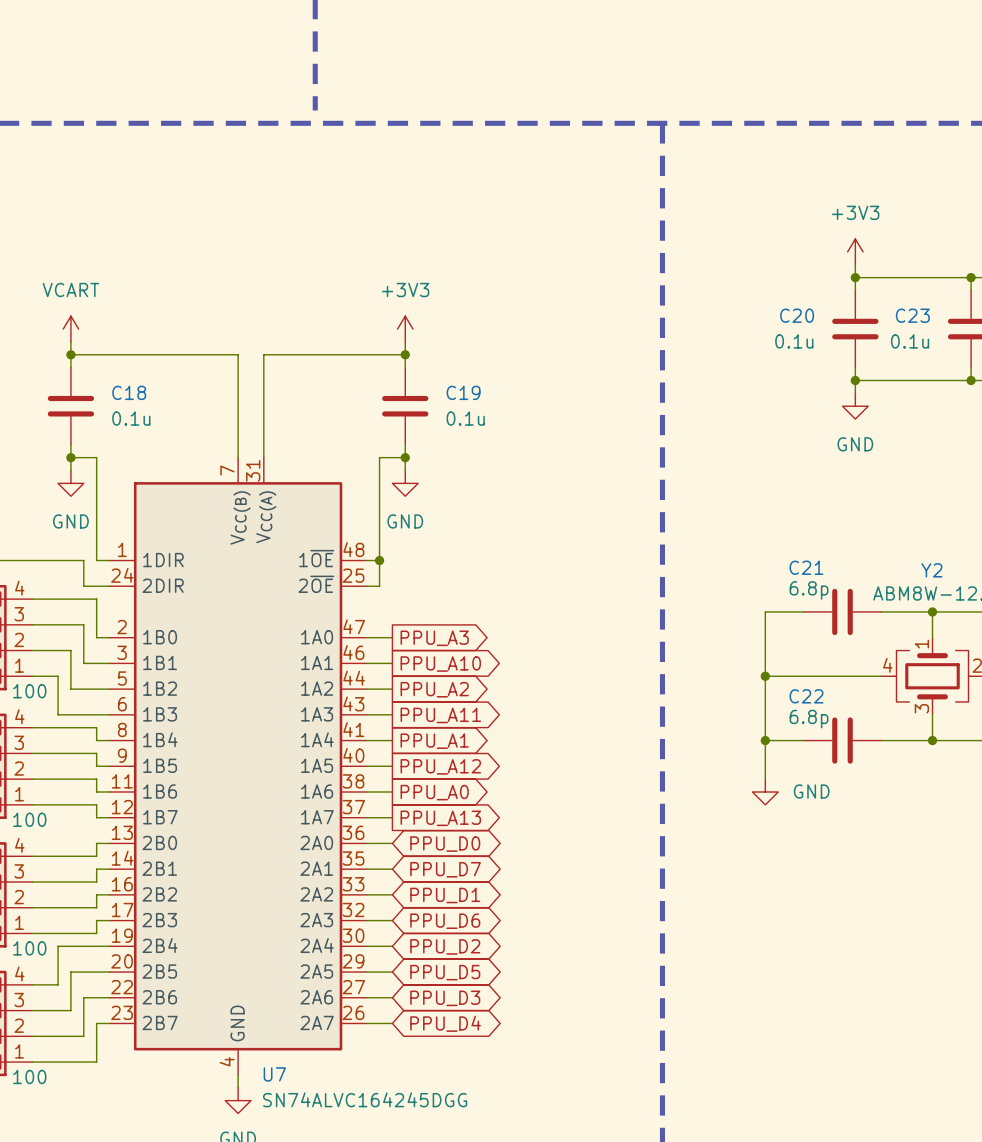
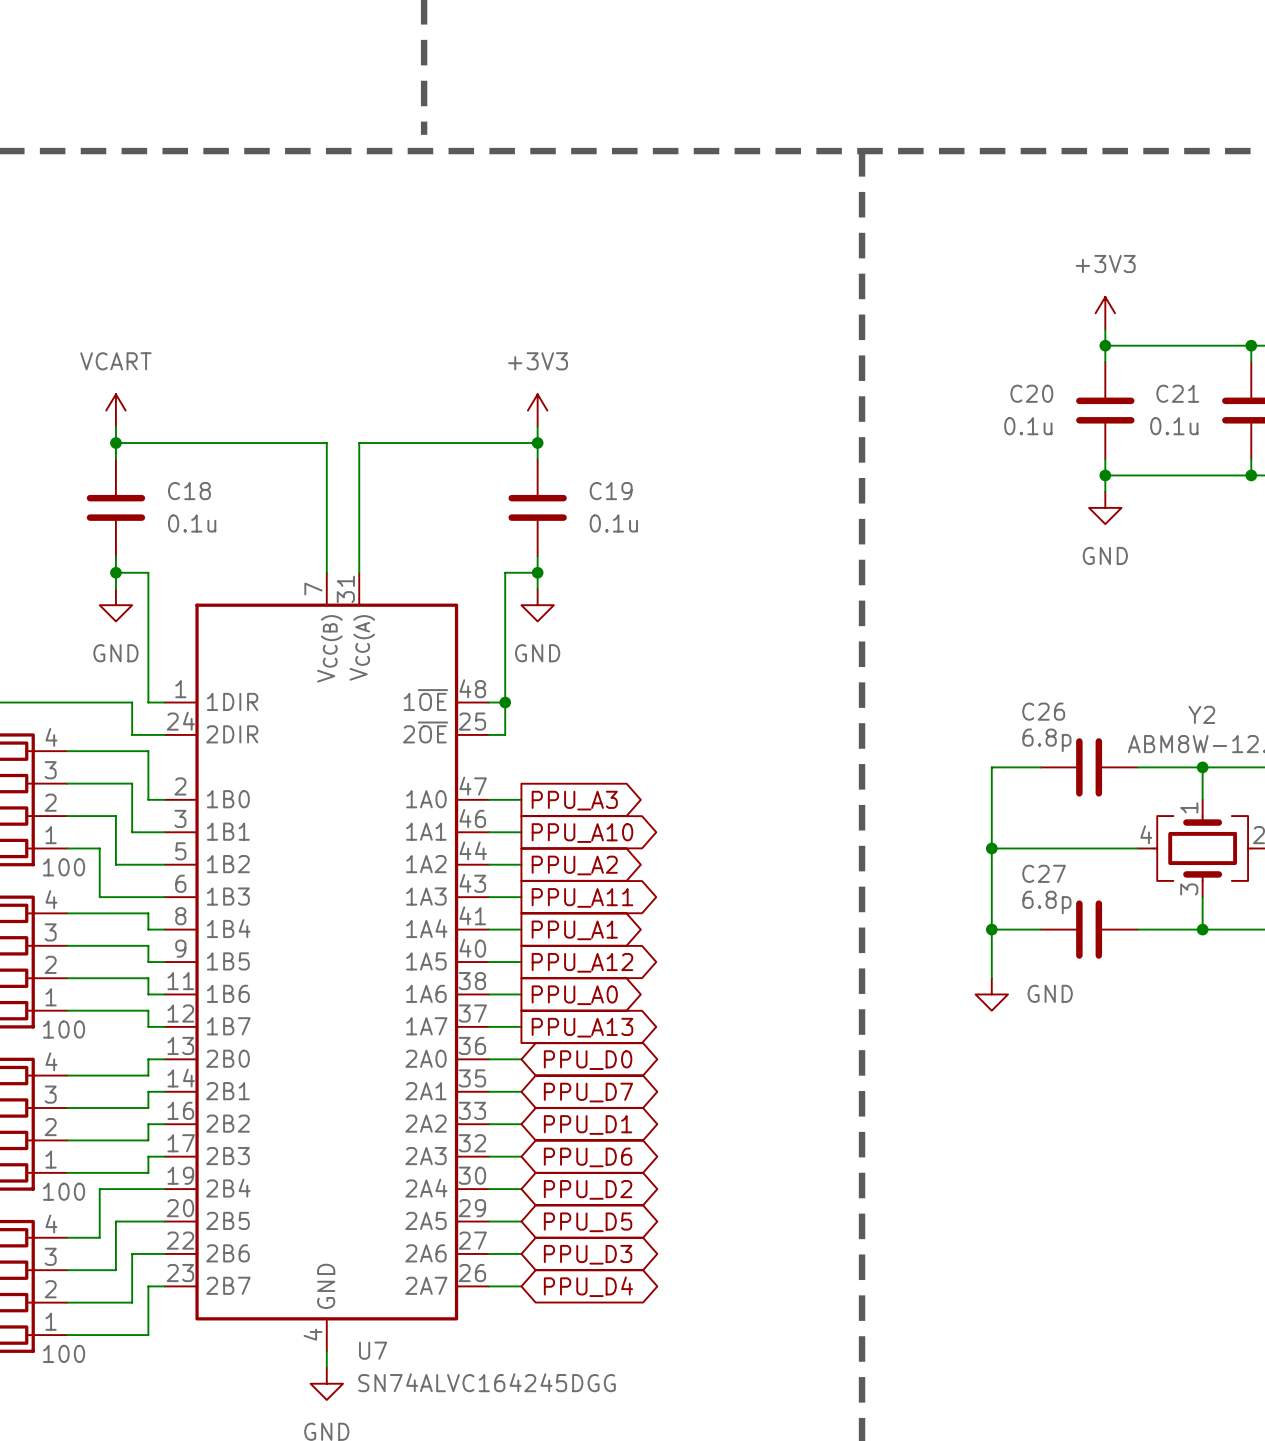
C23 name: C23 (912, 315) -> C21 (1177, 393)
C21 name: C21 (806, 567) -> C26 (1043, 711)
C22 name: C22 (806, 696) -> C27 (1044, 873)

